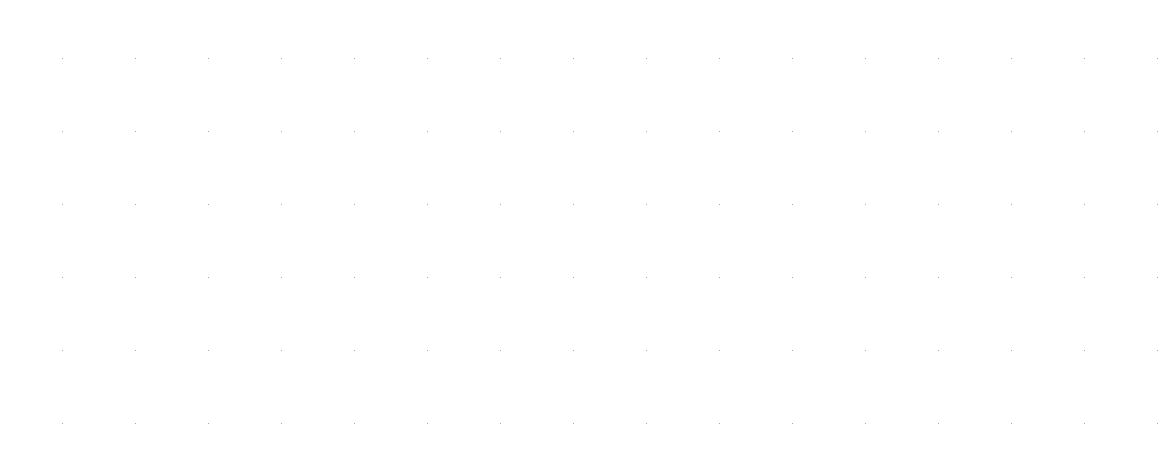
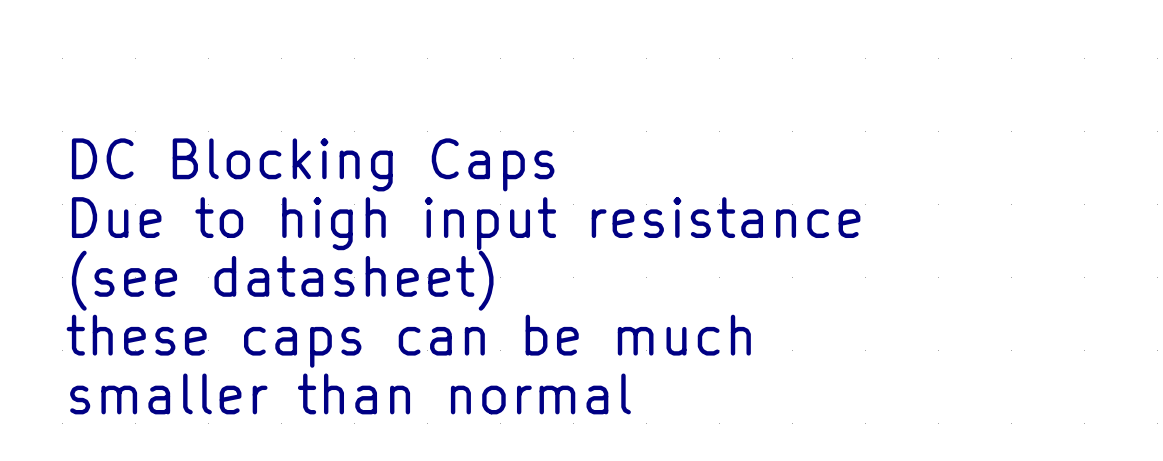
text: none -> DC Blocking Caps (313, 164)
text: none -> Due to high input resistance (466, 223)
text: none -> (see datasheet) (282, 280)
text: none -> these caps can be much (408, 341)
text: none -> smaller than normal (350, 393)

